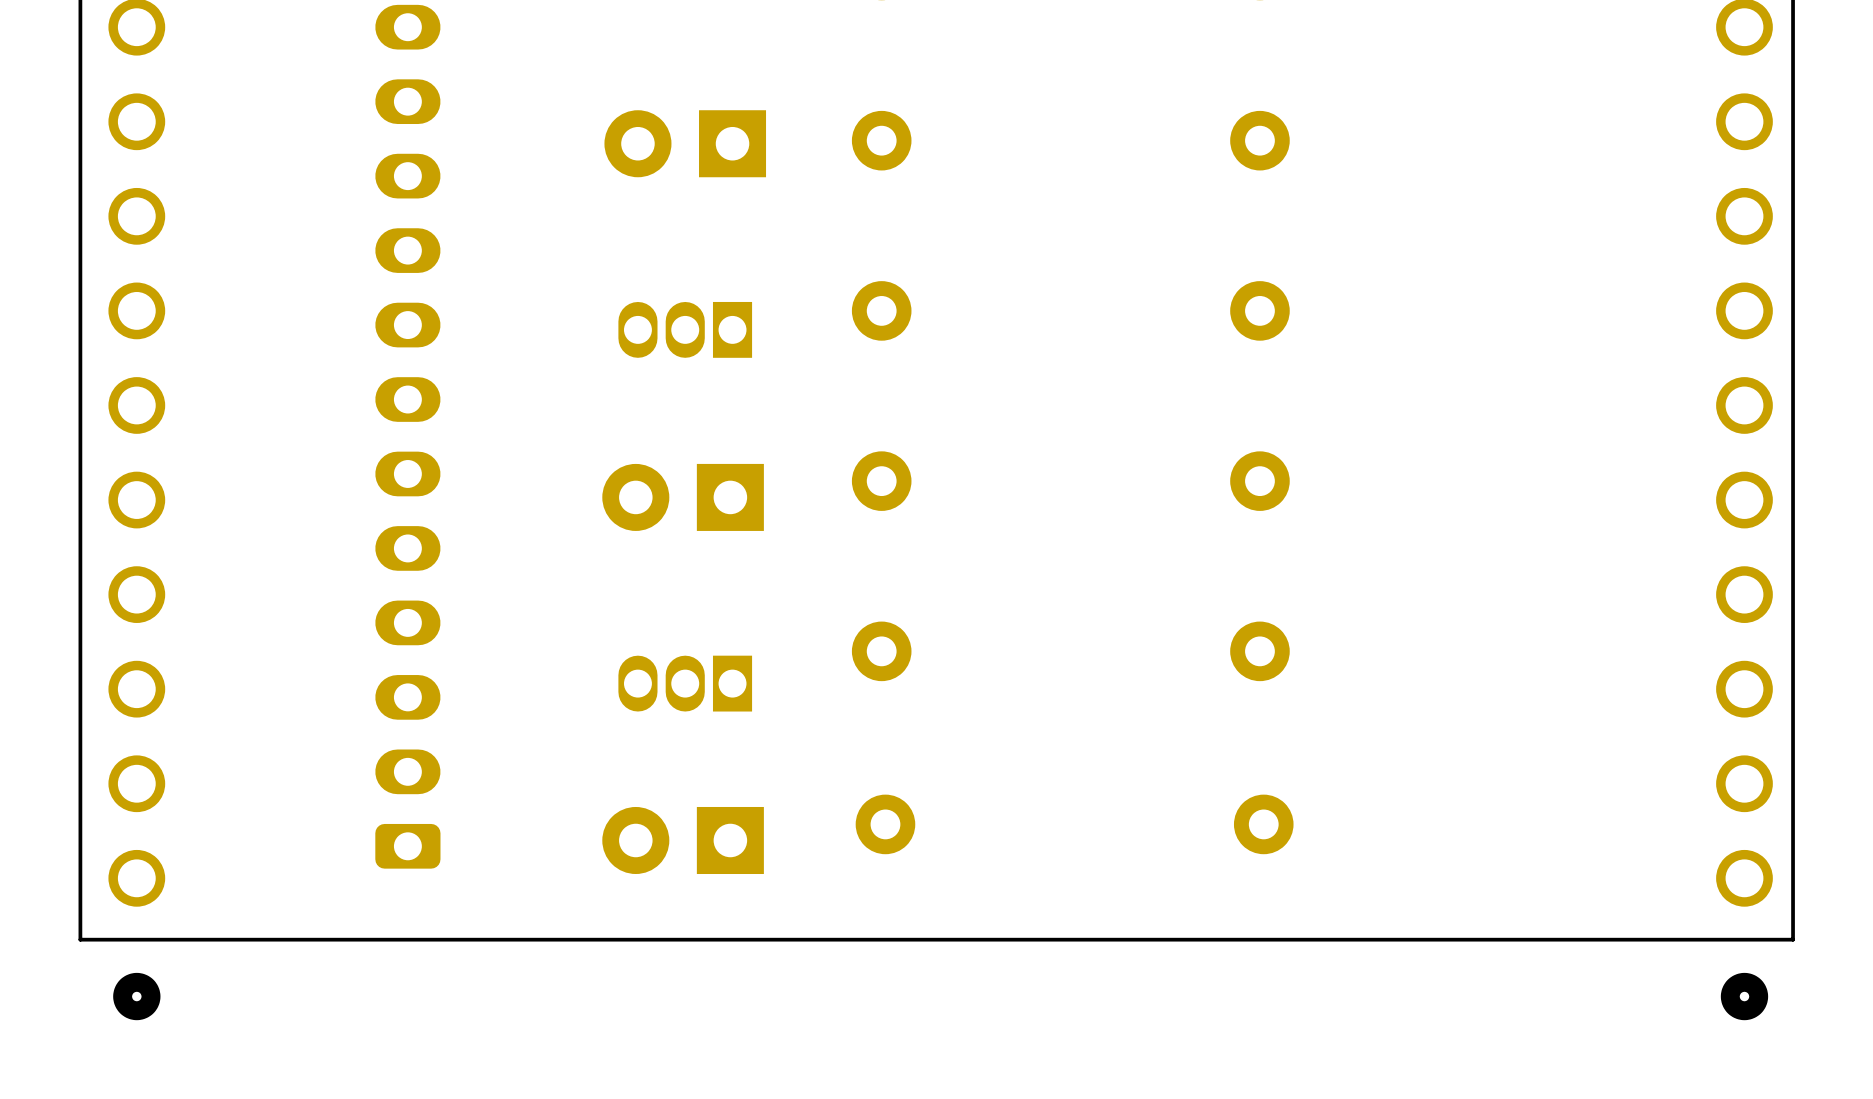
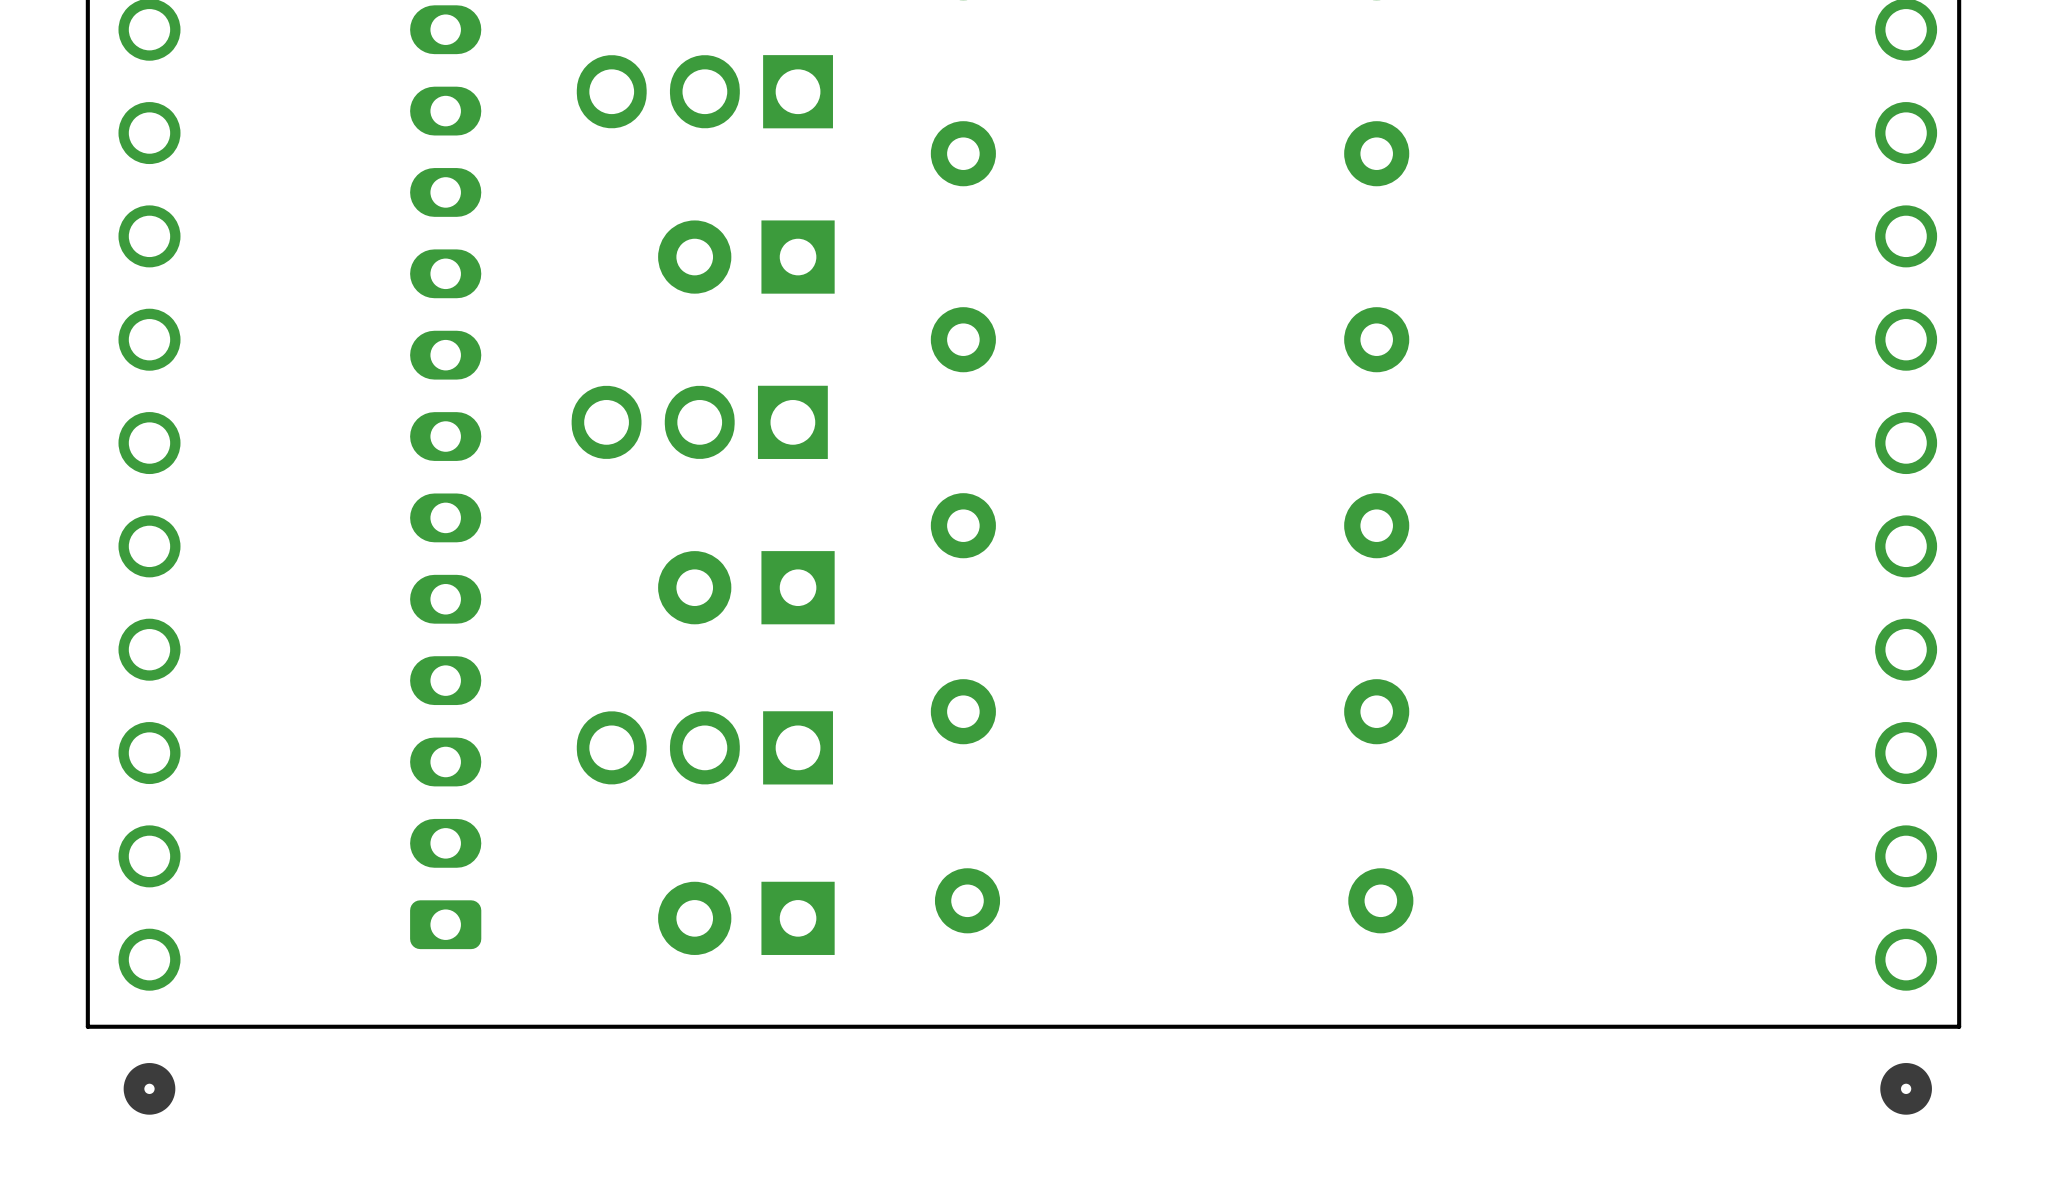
part: none -> (704, 91)
part position: (685, 143) -> (746, 257)
part: (685, 329) -> none
part: none -> (699, 422)
part position: (683, 497) -> (746, 587)
part: (685, 683) -> none
part: none -> (704, 747)

